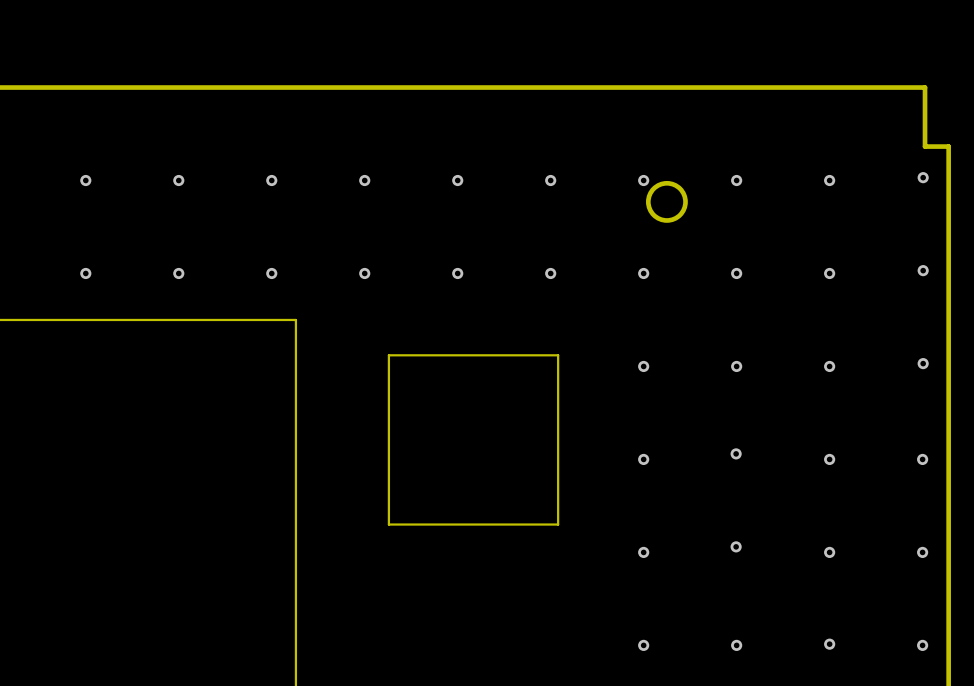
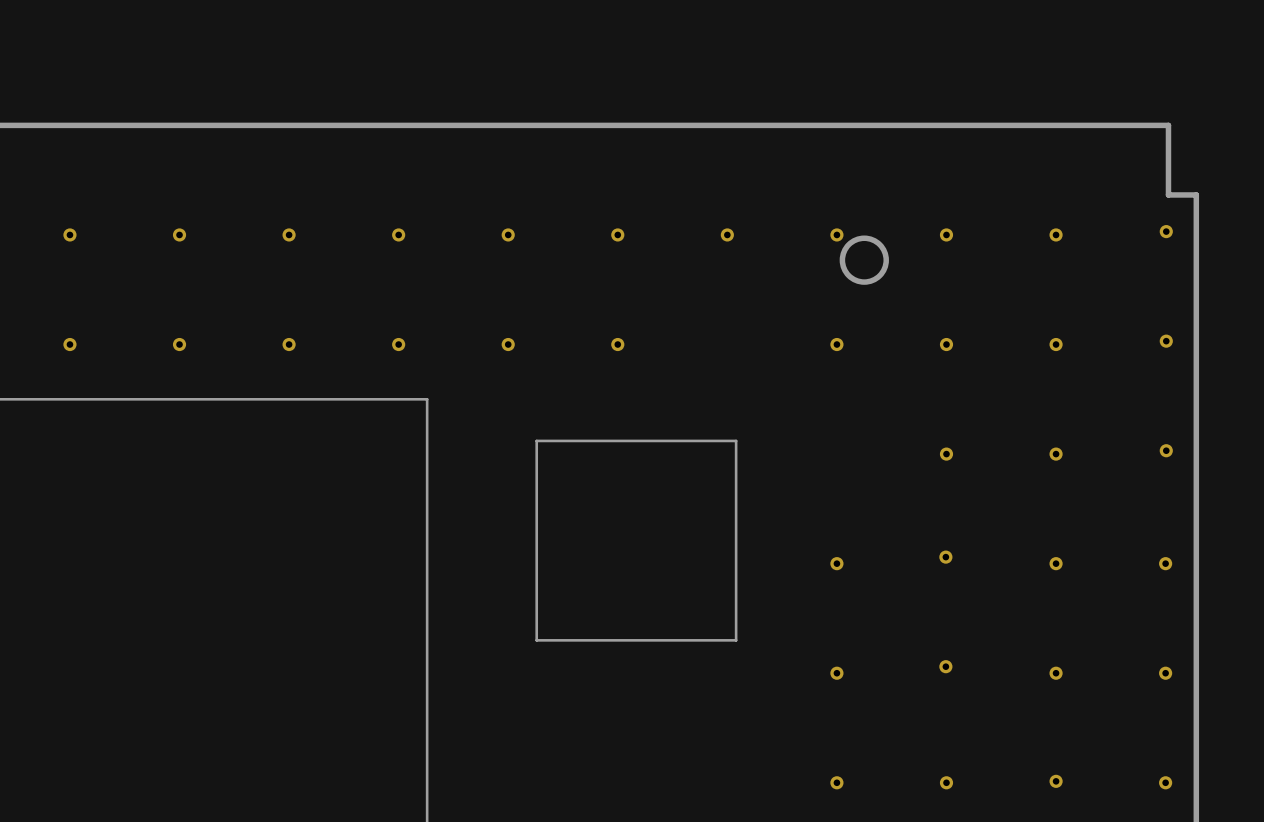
via: (550, 273) -> none
via: (643, 366) -> none

